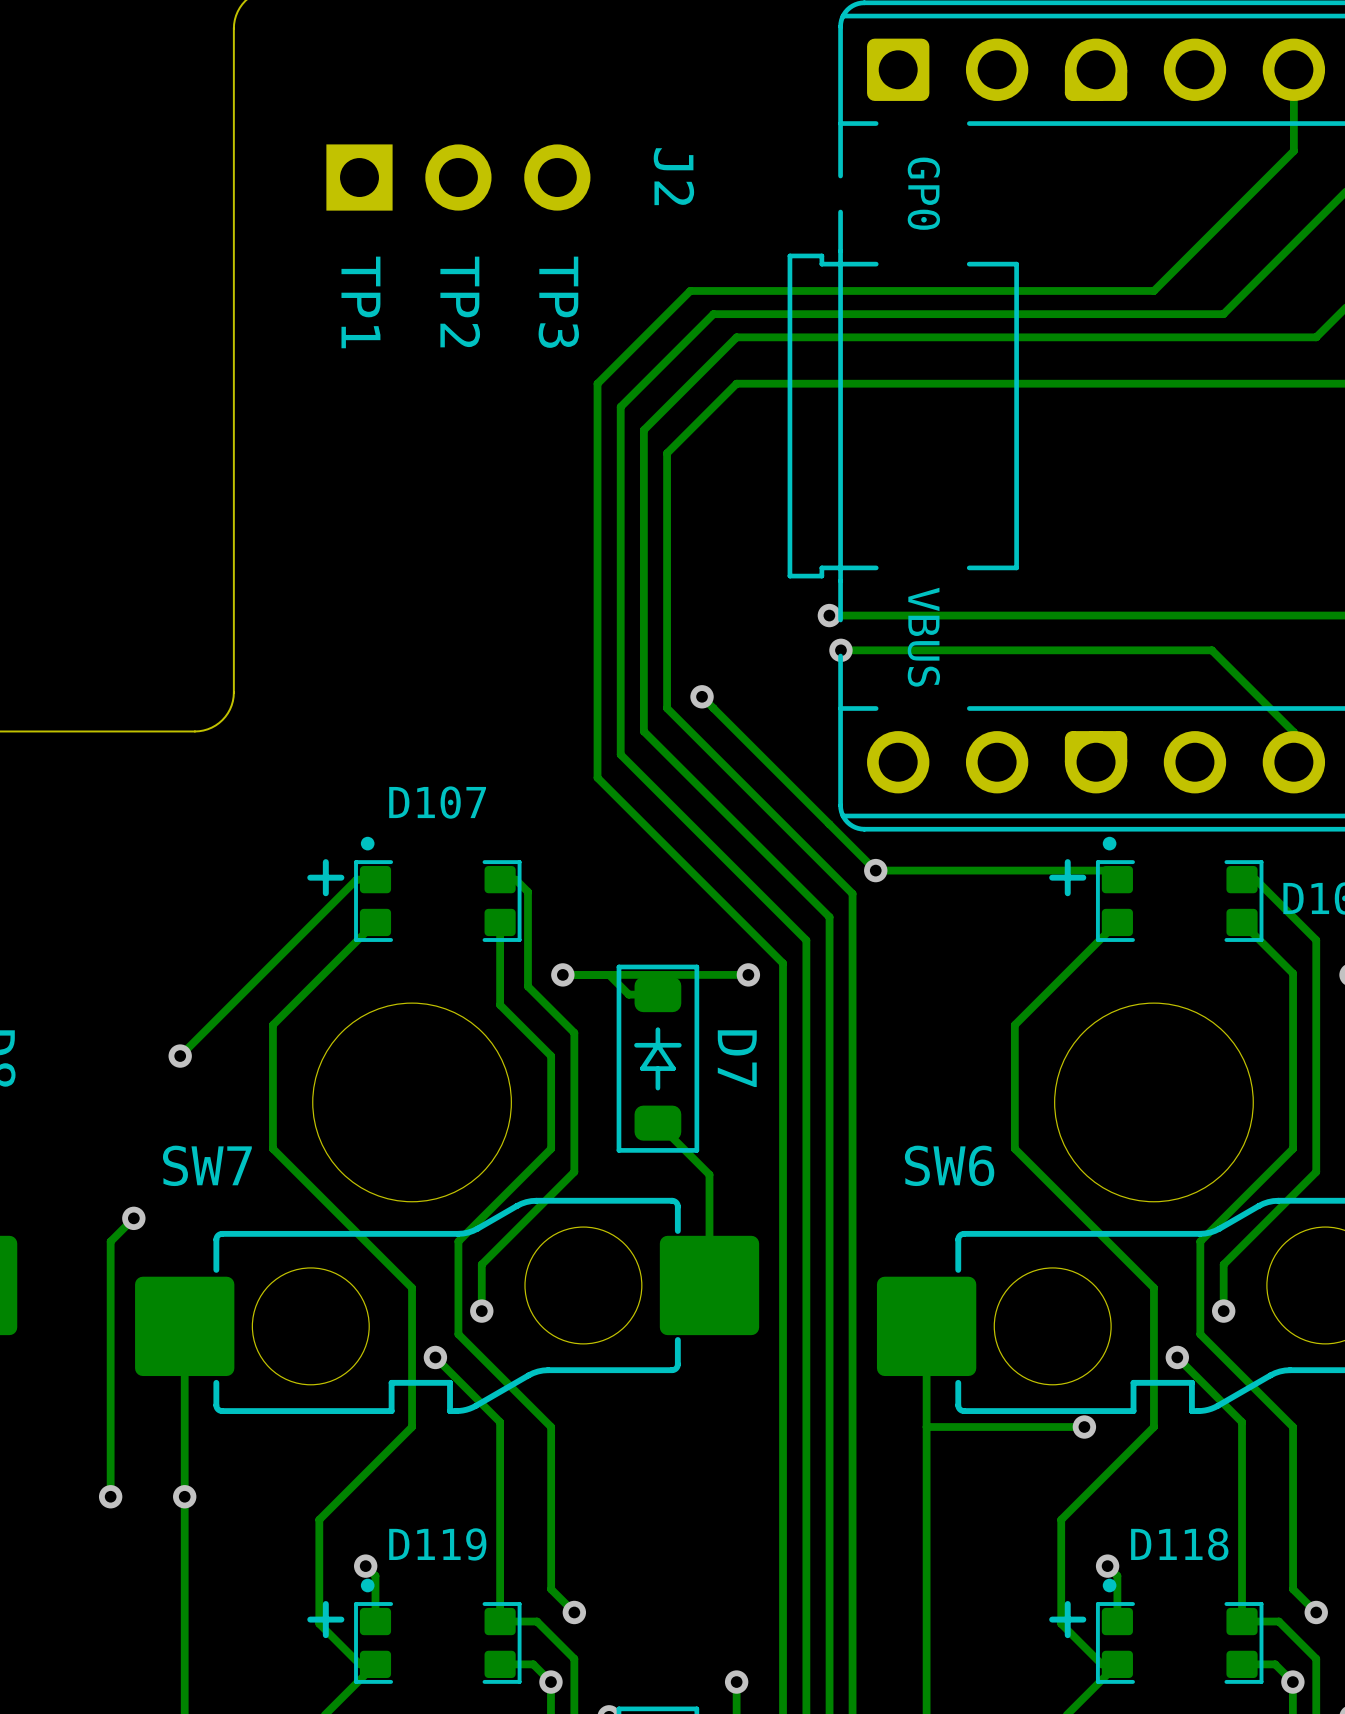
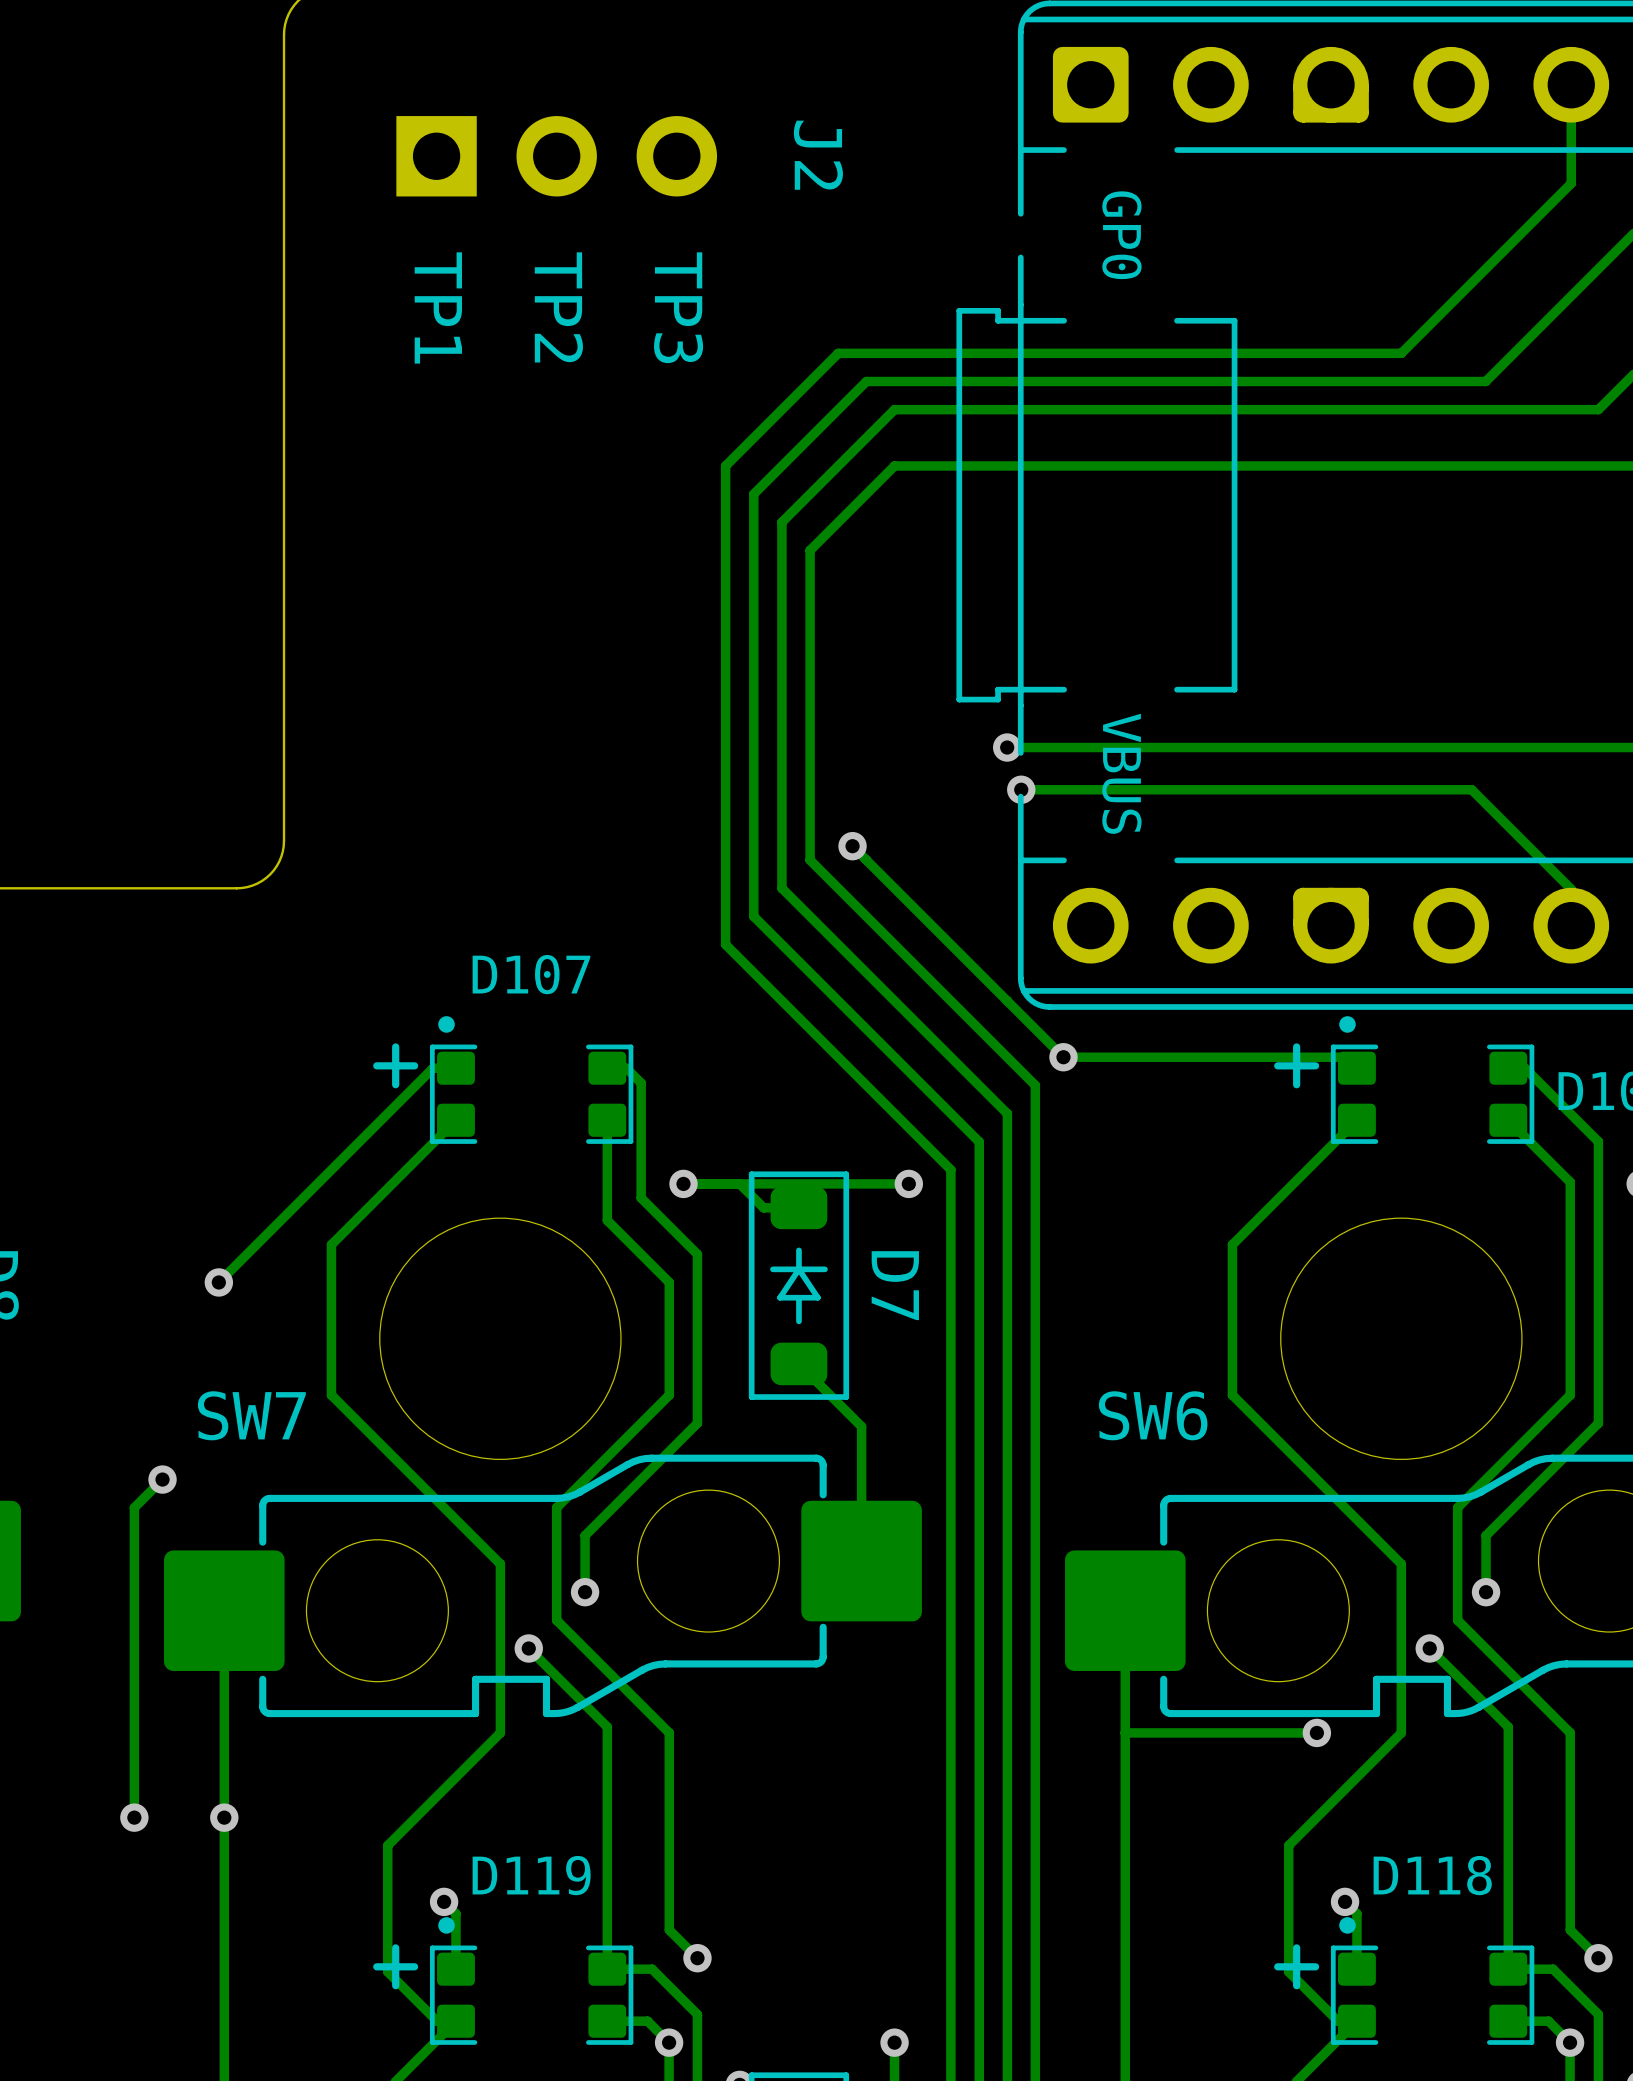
J2 position: (458, 177) -> (556, 156)

